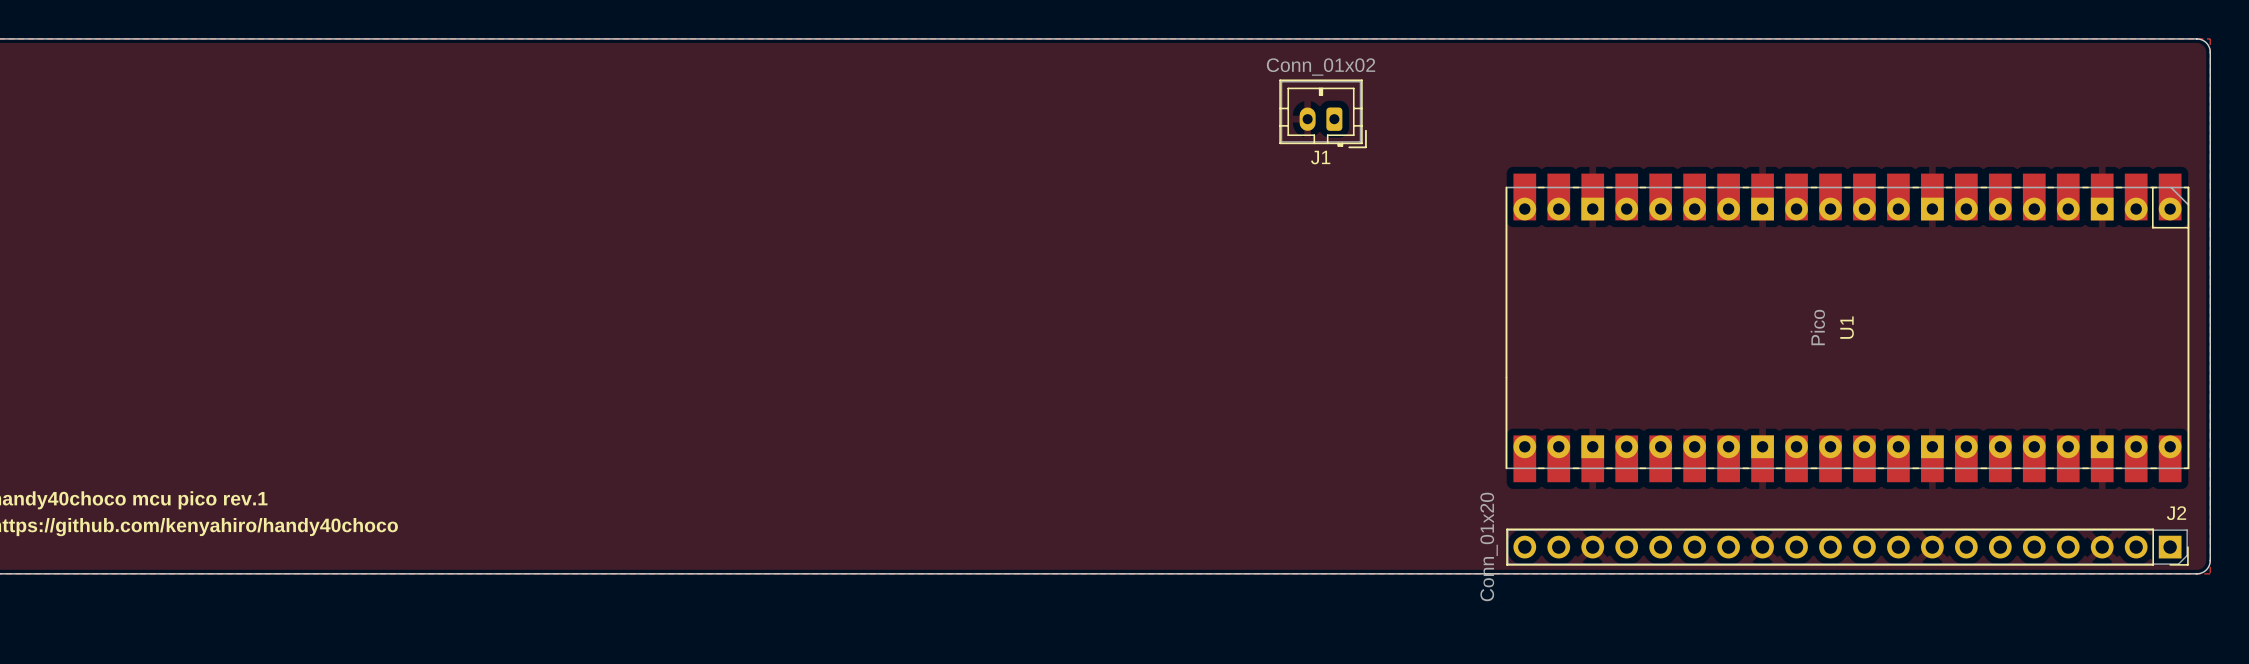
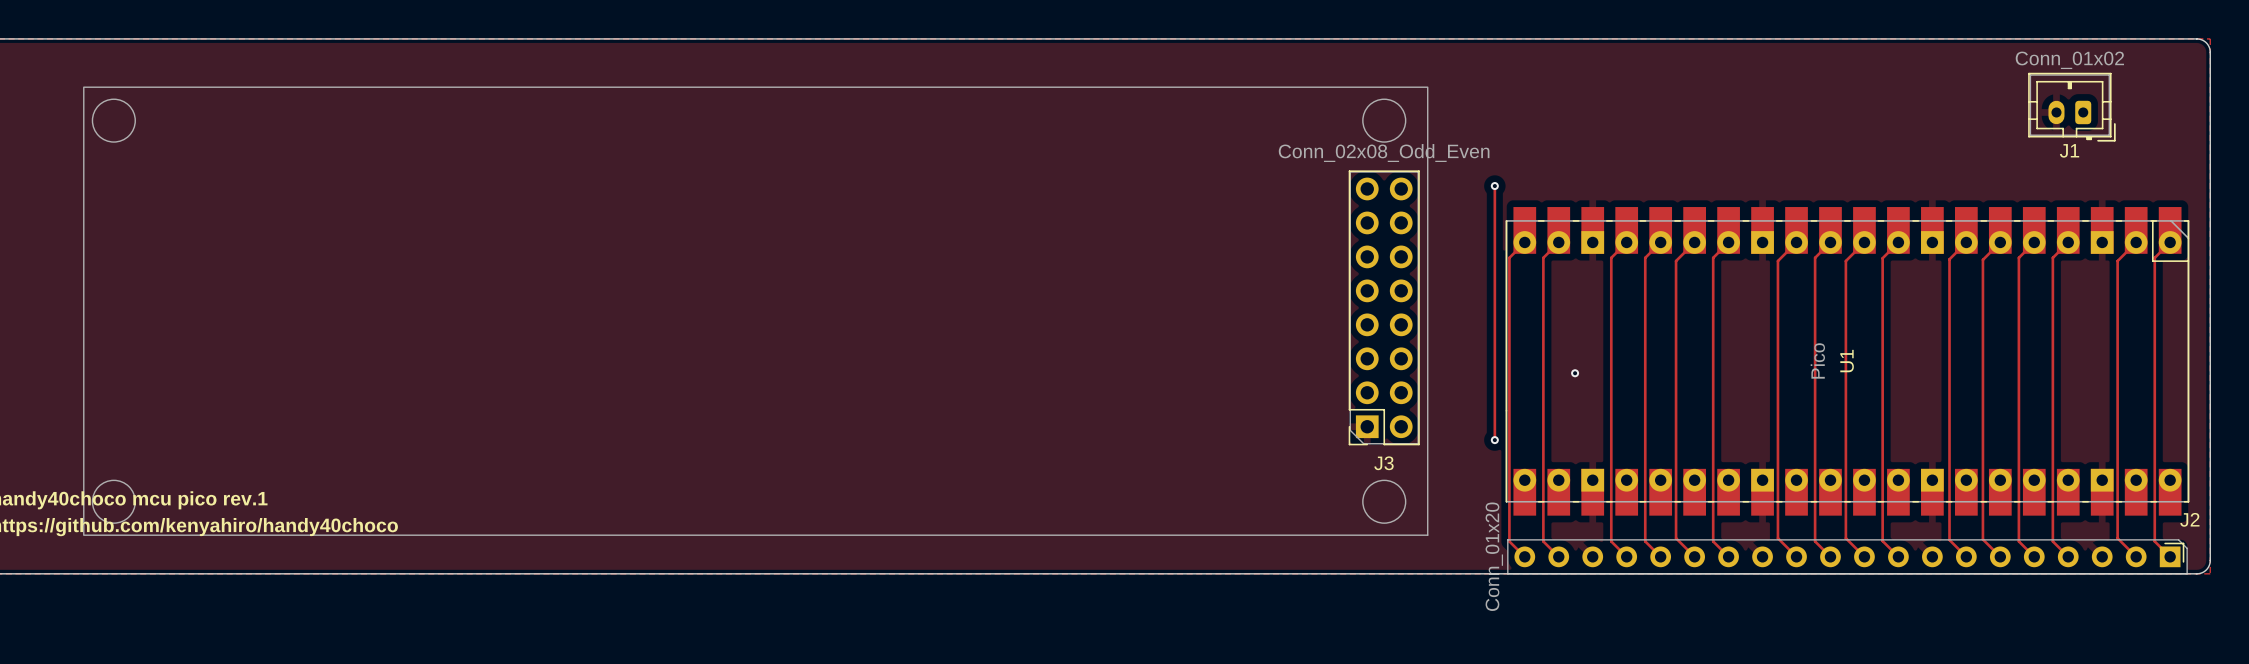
J1 position: (1323, 113) -> (2071, 107)
track: none -> (1494, 186) (1494, 440)
via: none -> (1494, 186)
track: none -> (1524, 242) (1509, 257) (1509, 541) (1524, 556)
track: none -> (1558, 242) (1543, 257) (1543, 541) (1558, 556)
track: none -> (1626, 242) (1611, 257) (1611, 541) (1626, 556)
track: none -> (1660, 242) (1645, 257) (1645, 541) (1660, 556)
track: none -> (1694, 242) (1676, 261) (1676, 538) (1694, 556)
track: none -> (1728, 242) (1713, 257) (1713, 541) (1728, 556)
track: none -> (1796, 242) (1777, 261) (1777, 538) (1796, 556)
track: none -> (1830, 242) (1815, 257) (1815, 541) (1830, 556)
track: none -> (1864, 242) (1845, 261) (1845, 538) (1864, 556)
track: none -> (1898, 242) (1882, 258) (1882, 541) (1898, 556)
track: none -> (1966, 242) (1949, 259) (1949, 540) (1966, 556)
track: none -> (2000, 242) (1982, 259) (1982, 539) (2000, 556)
track: none -> (2034, 242) (2018, 257) (2018, 541) (2034, 556)
track: none -> (2068, 242) (2052, 257) (2052, 541) (2068, 556)
track: none -> (2136, 242) (2117, 261) (2117, 538) (2136, 556)
track: none -> (2170, 242) (2154, 257) (2154, 541) (2170, 556)
J3: none -> Conn_02x08_Odd_Even (755, 311)
U1 position: (1847, 327) -> (1847, 361)
via: none -> (1575, 373)
via: none -> (1494, 440)
J2 footprint: [1506, 528, 2189, 566] -> [1507, 539, 2188, 575]

